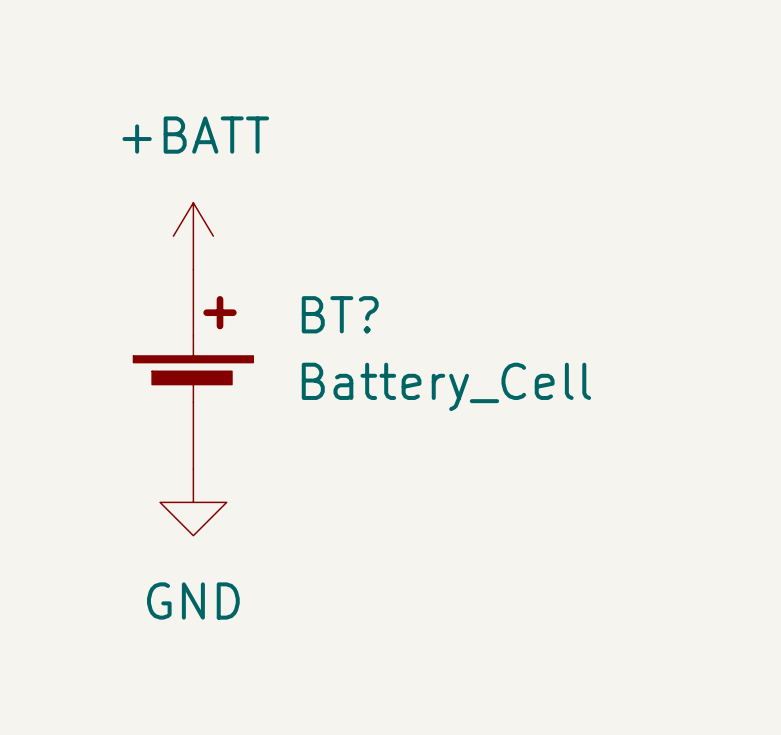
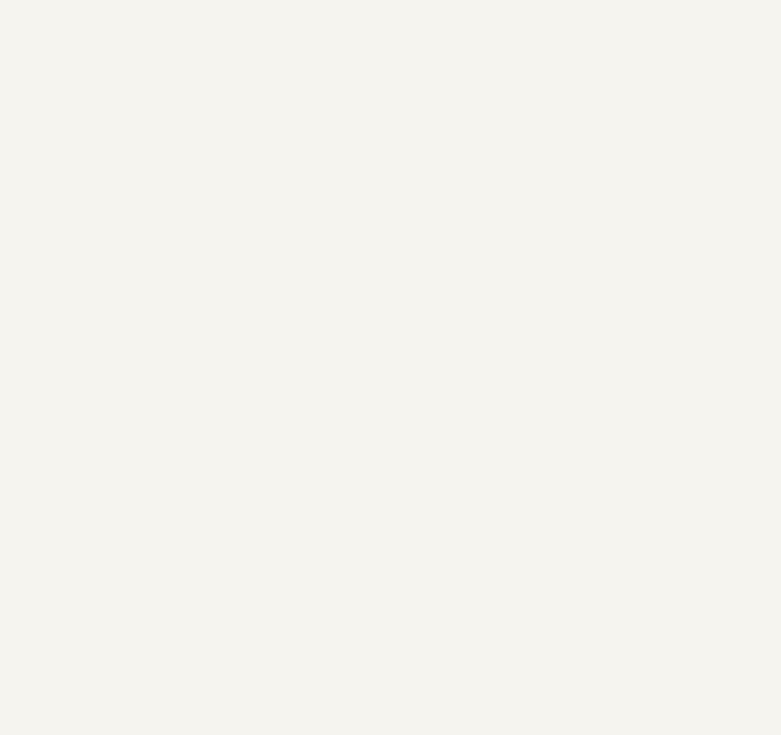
power symbol: +BATT (193, 236) -> none
BT?: Battery_Cell (193, 369) -> none
power symbol: GND (193, 502) -> none

